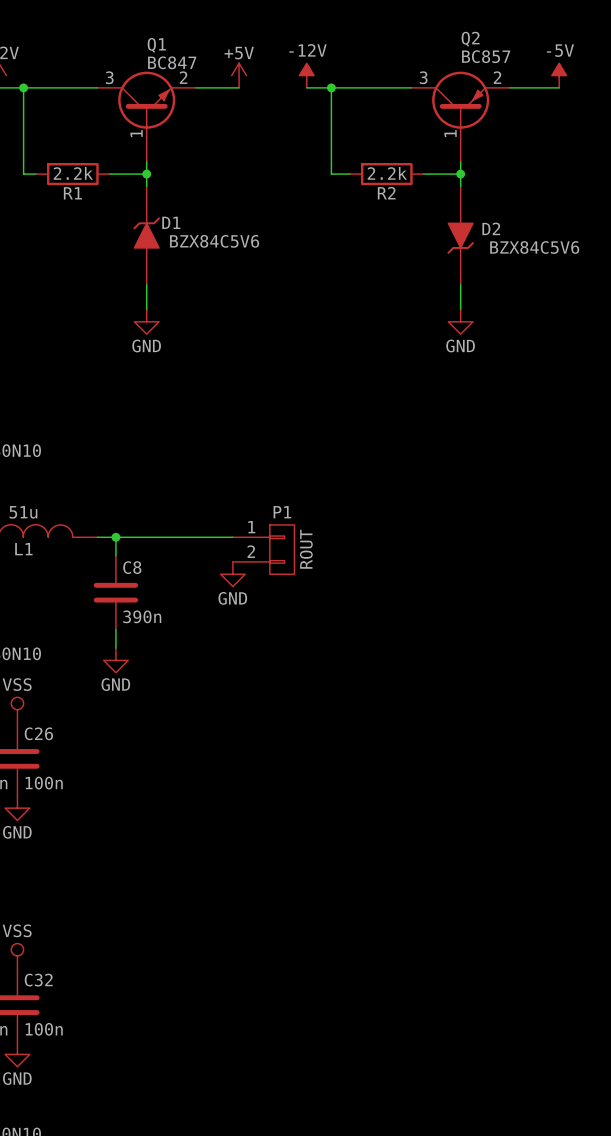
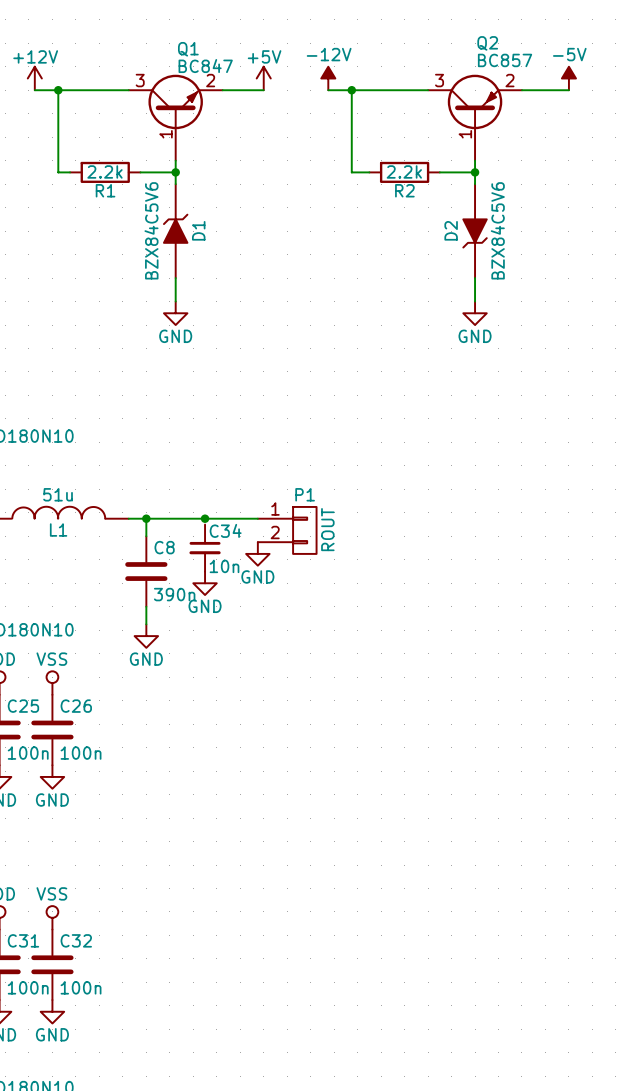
D1 name rotation: 0° (171, 222) -> 90° counterclockwise (198, 230)
D2 name rotation: 0° (491, 228) -> 90° counterclockwise (451, 230)
D2 name position: D2 (491, 228) -> D2 (451, 230)
D1 value rotation: 0° (214, 241) -> 90° counterclockwise (151, 230)
D2 value rotation: 0° (534, 247) -> 90° counterclockwise (497, 230)
junction: none -> (205, 518)
C34: none -> 10n (205, 548)
power symbol: none -> GND (205, 583)

